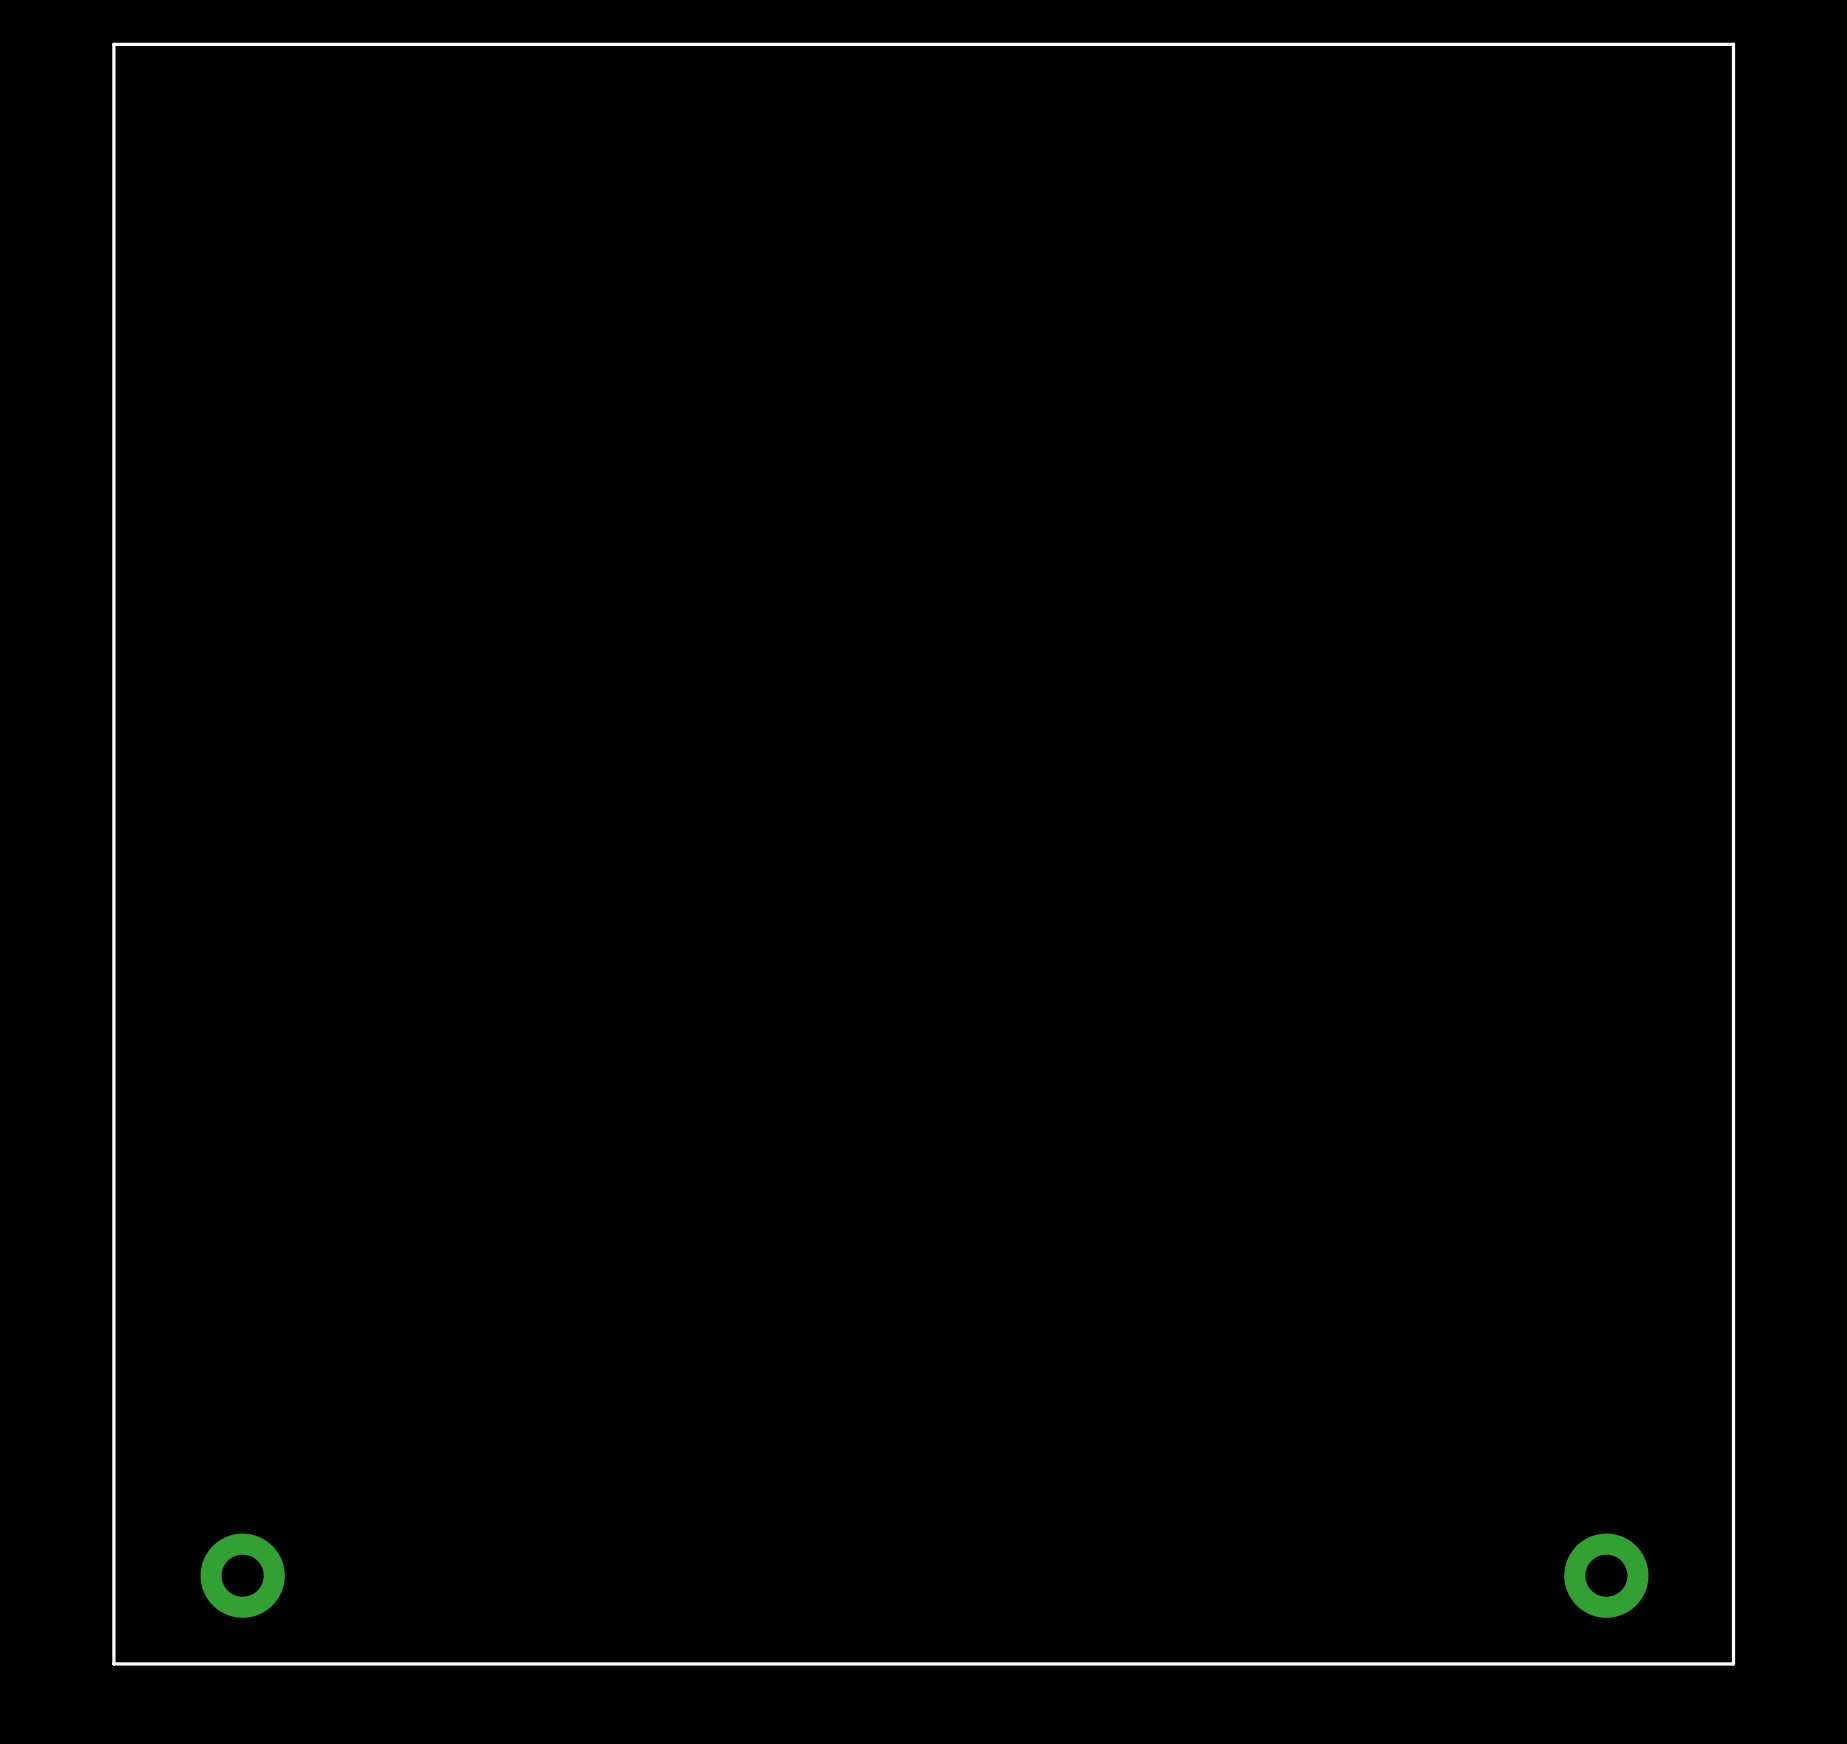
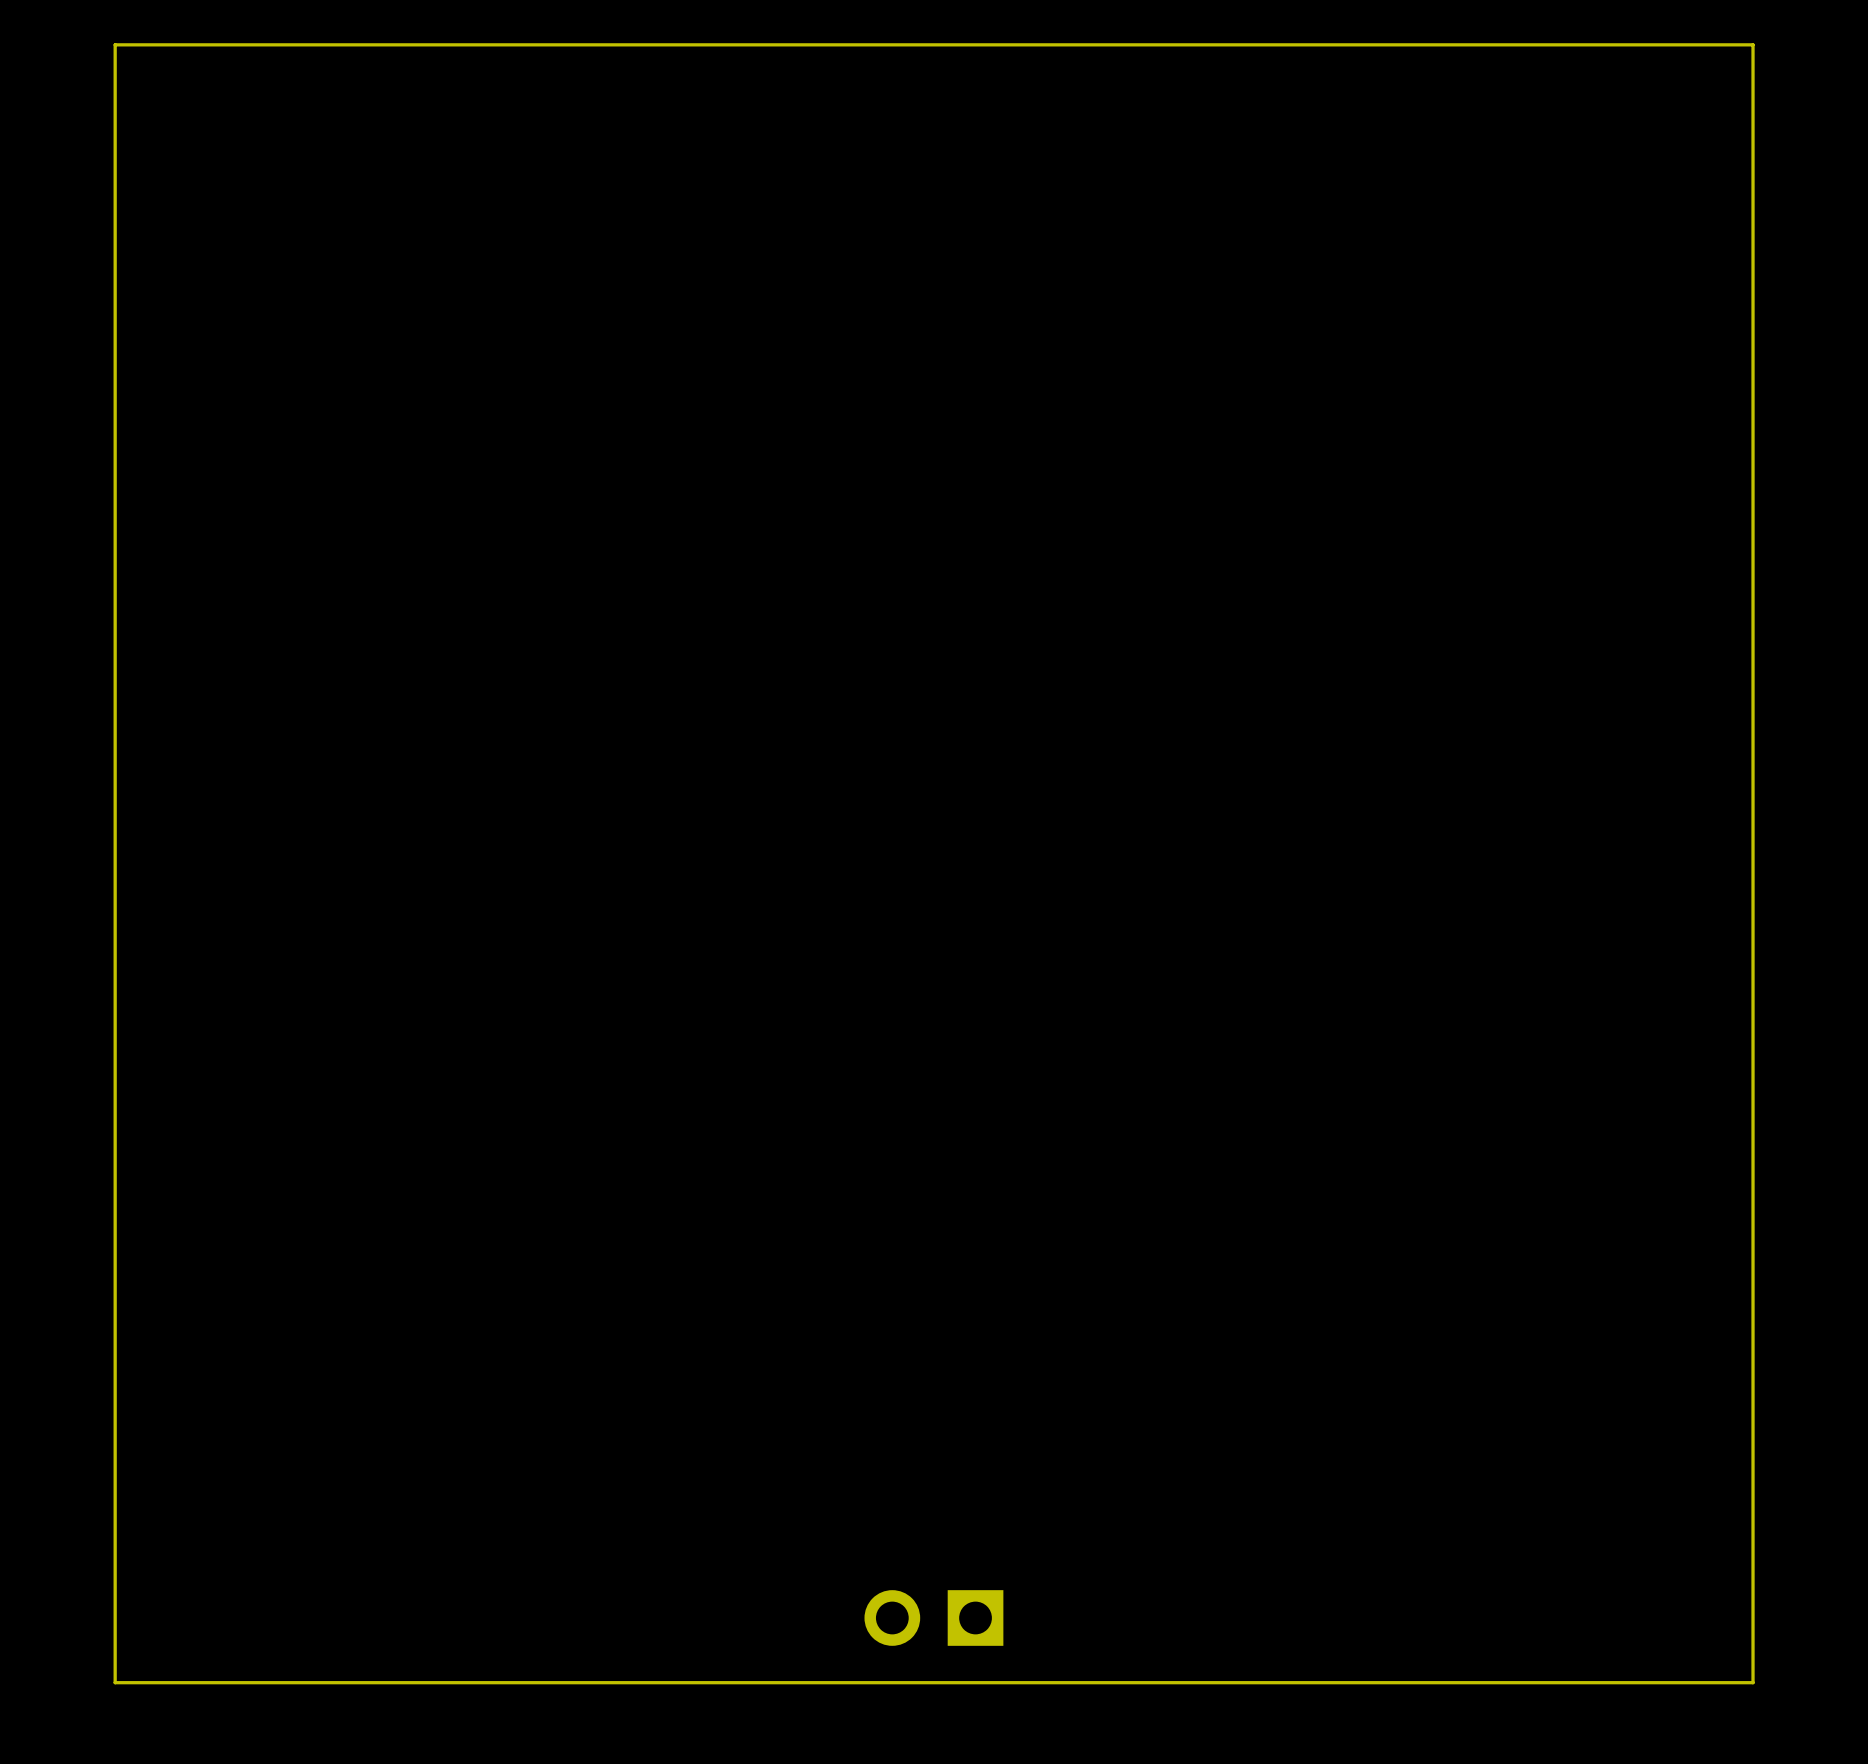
part: (242, 1575) -> none
part: (1606, 1575) -> none
part: none -> (933, 1617)

